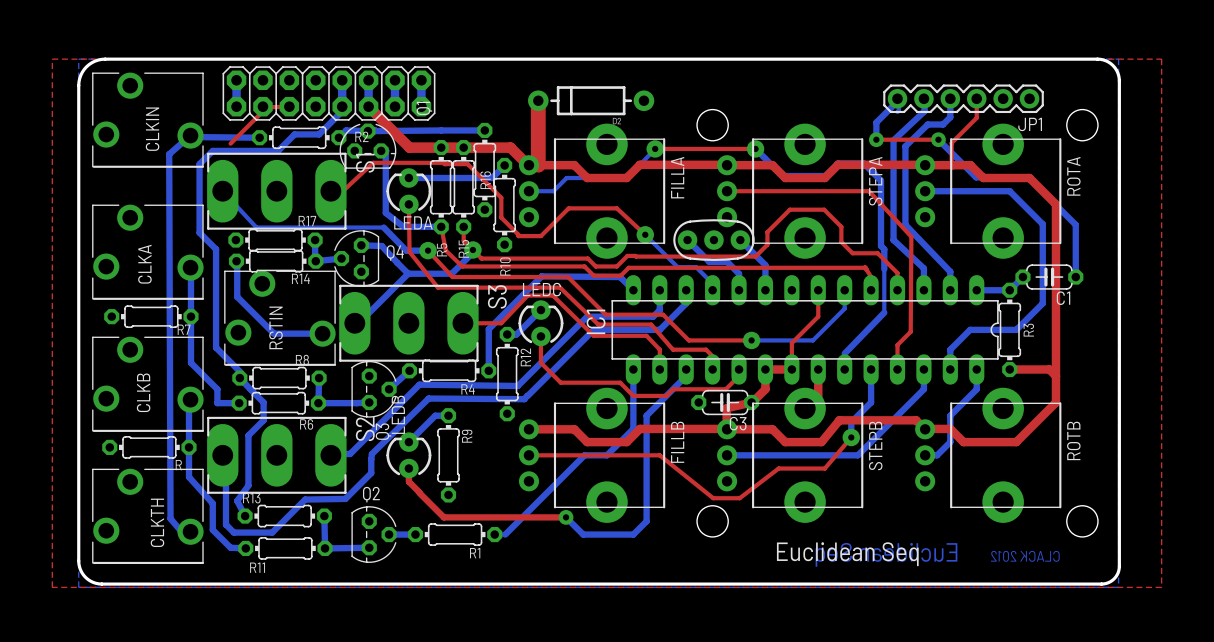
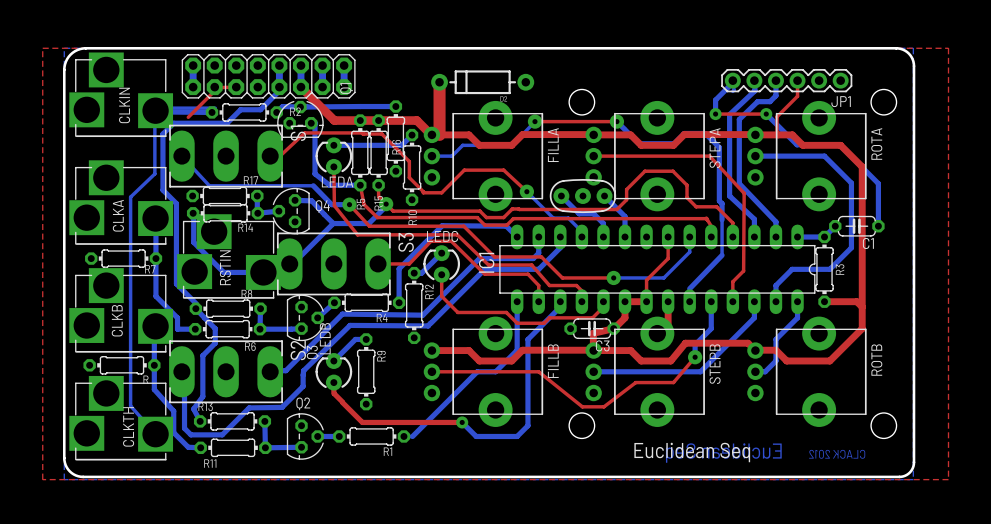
CLKIN footprint: [92, 72, 205, 168] -> [69, 52, 174, 138]
bottom track: (190, 135) (169, 154) (170, 518) (181, 531) (190, 531) -> (215, 108) (158, 108) (154, 111) (154, 173) (130, 197) (130, 406) (155, 434)
CLKA footprint: [92, 204, 205, 300] -> [69, 160, 174, 245]
RSTIN footprint: [224, 270, 337, 366] -> [177, 214, 281, 299]
CLKB footprint: [92, 336, 205, 432] -> [69, 268, 174, 353]
CLKTH footprint: [92, 468, 205, 565] -> [69, 375, 174, 461]

